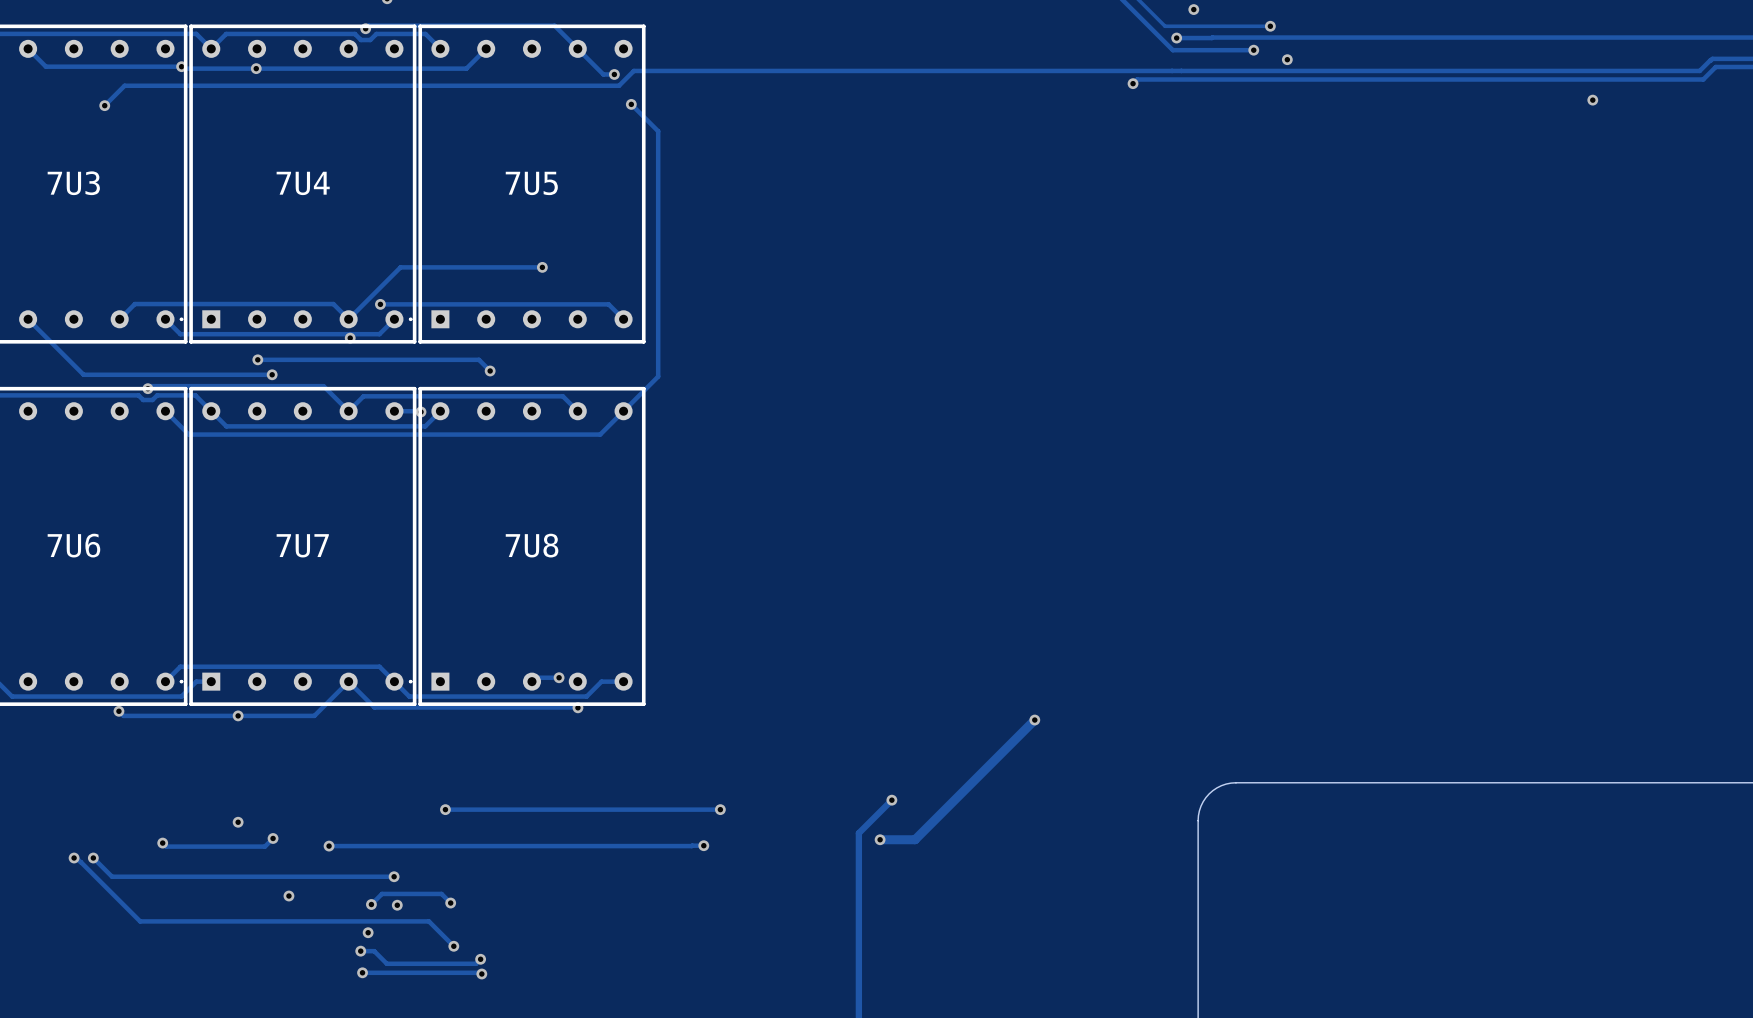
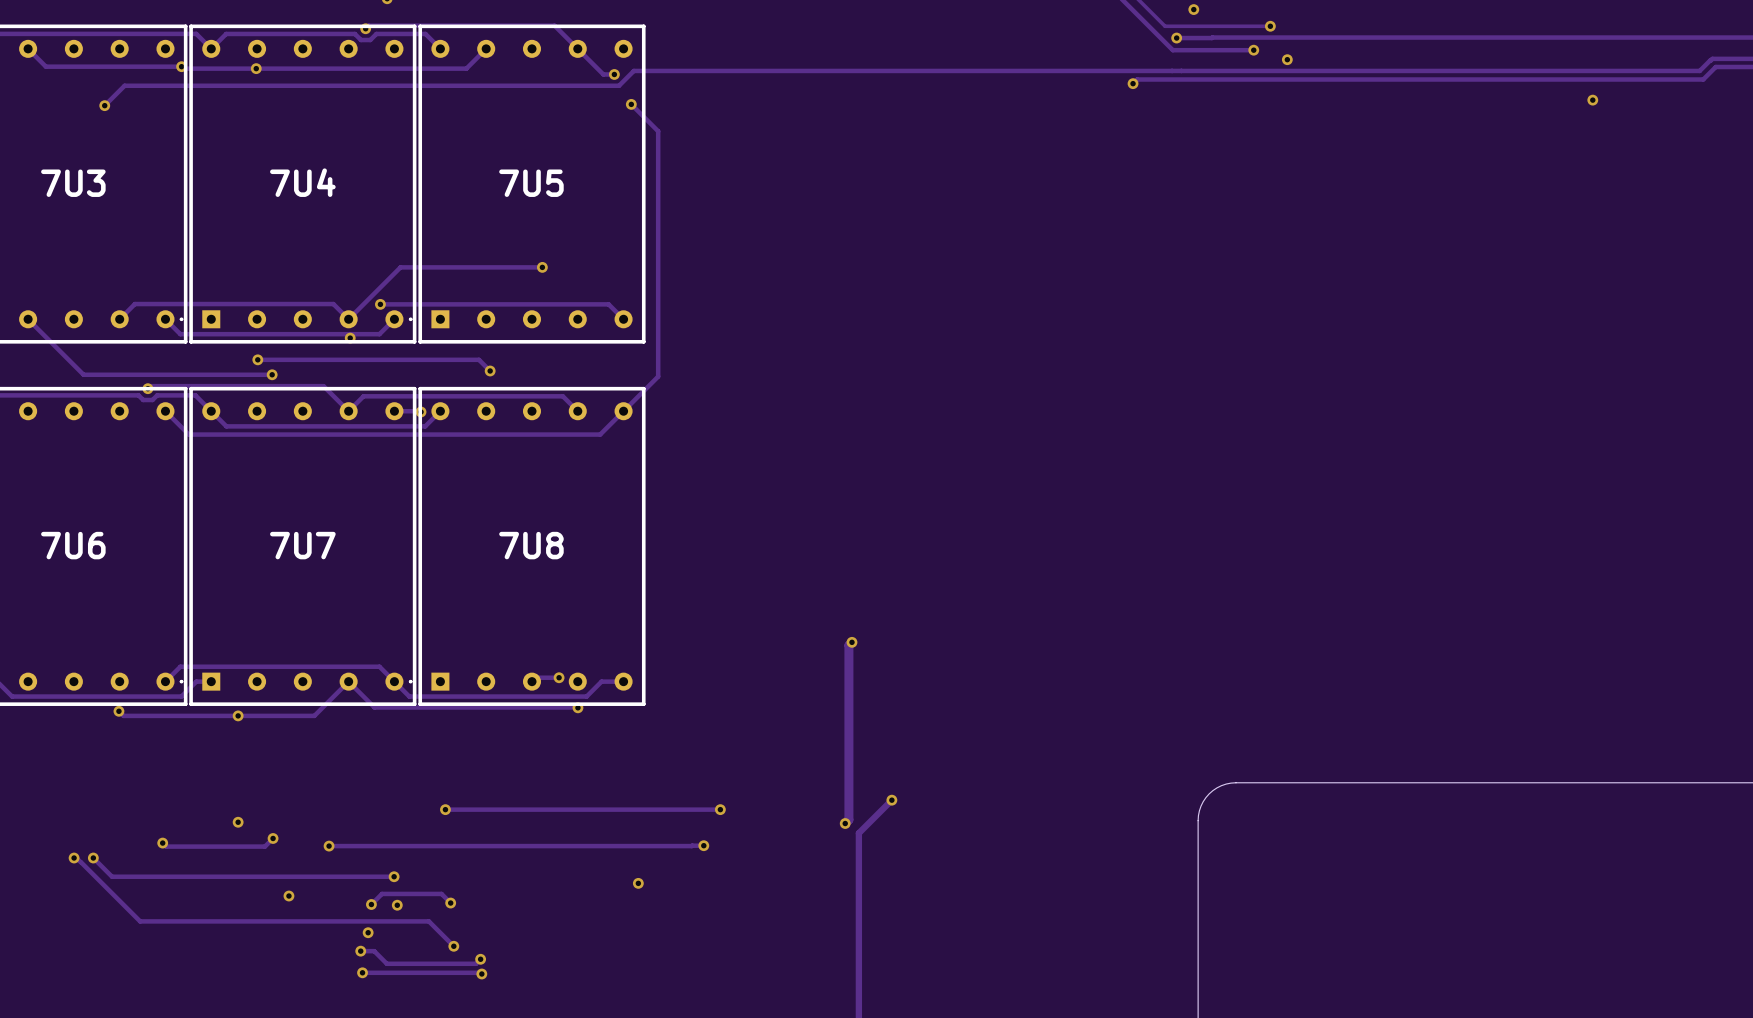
track: none -> (851, 642) (848, 645) (848, 819) (845, 823)
via: none -> (851, 642)
track: (1034, 720) (915, 839) (880, 839) -> none
via: (1034, 720) -> none
via position: (880, 839) -> (845, 823)
via: none -> (638, 883)

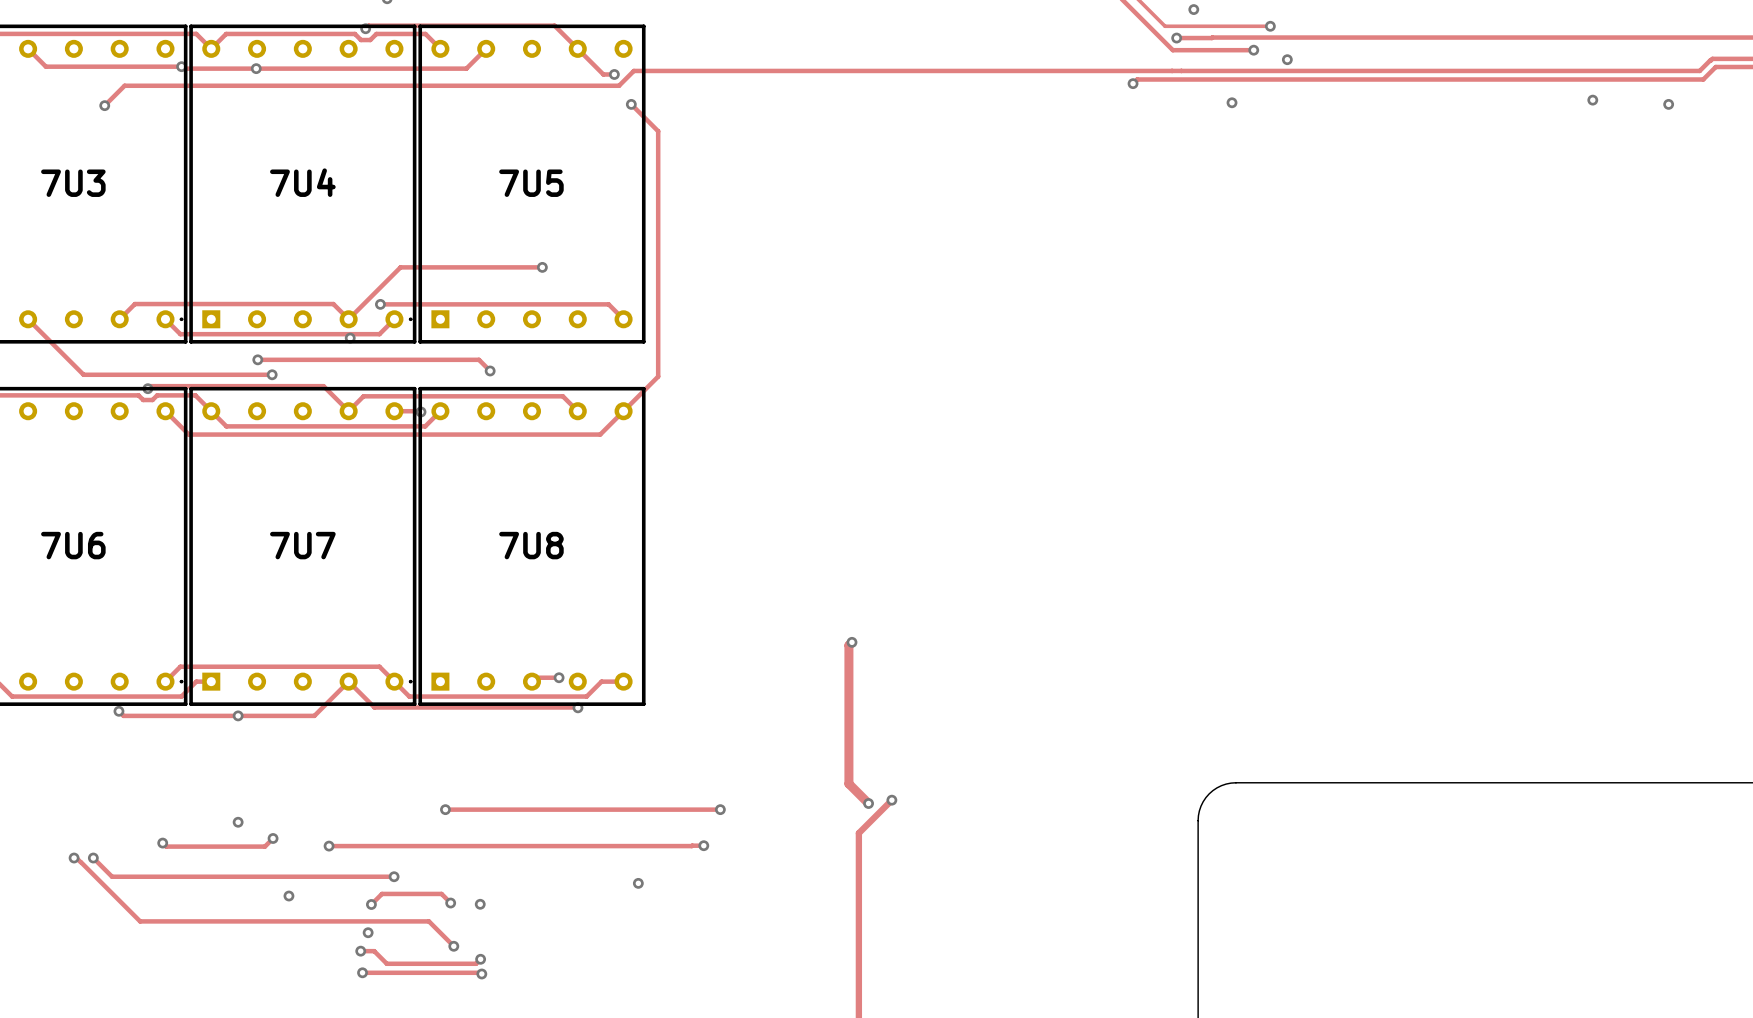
via: none -> (1232, 102)
via: none -> (1668, 104)
track: (848, 783) (848, 819) (845, 823) -> (848, 783) (868, 803)
via position: (845, 823) -> (868, 803)
via position: (397, 905) -> (480, 904)

